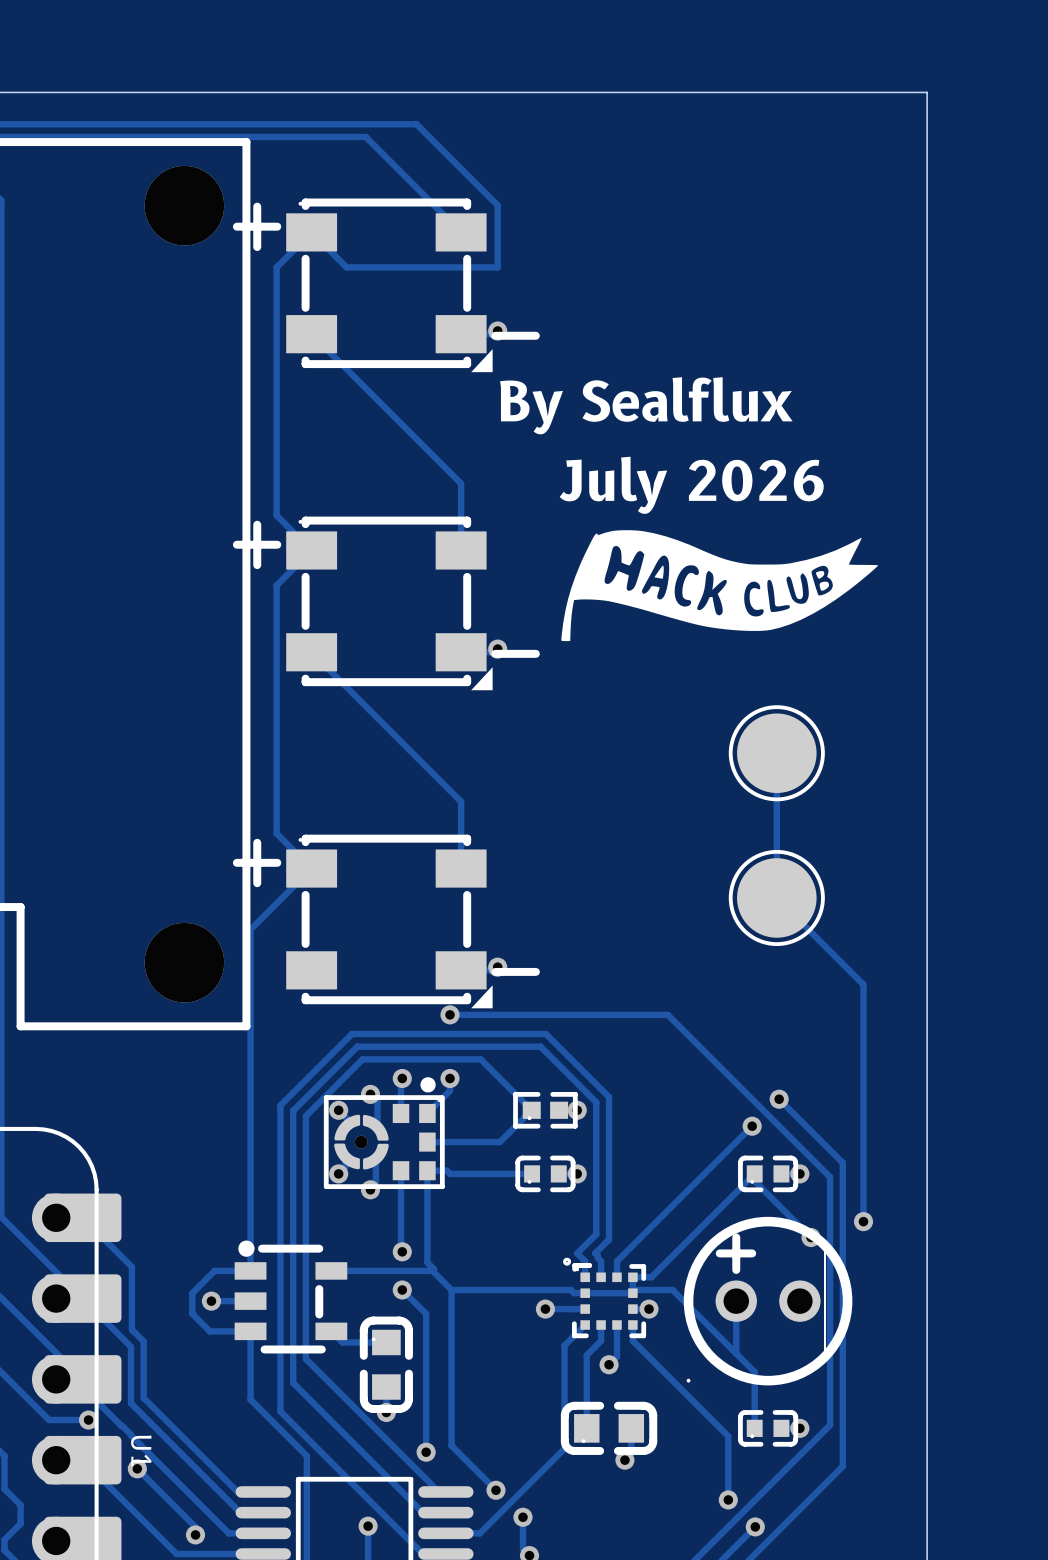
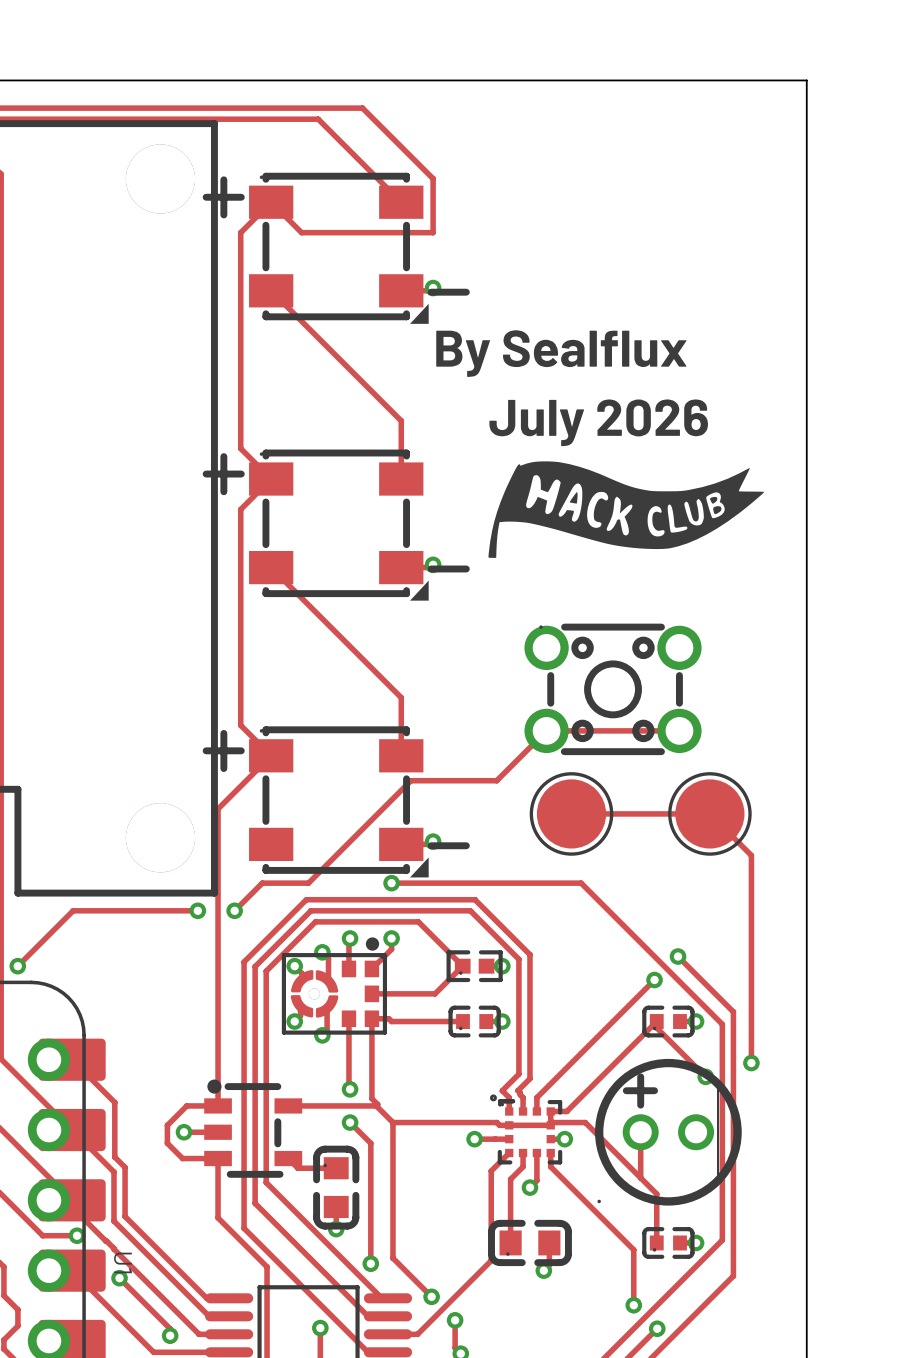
track: (776, 753) (776, 897) (863, 984) -> (571, 813) (709, 813) (751, 856)
part: (776, 753) -> none
part: none -> (613, 689)
track: none -> (679, 730) (546, 730) (496, 780) (410, 780) (308, 883) (262, 883) (234, 910)
part position: (776, 897) -> (709, 813)
part: none -> (571, 813)
track: none -> (197, 910) (73, 910) (17, 966)
via: none -> (197, 910)
via: none -> (234, 910)
via: none -> (17, 966)

